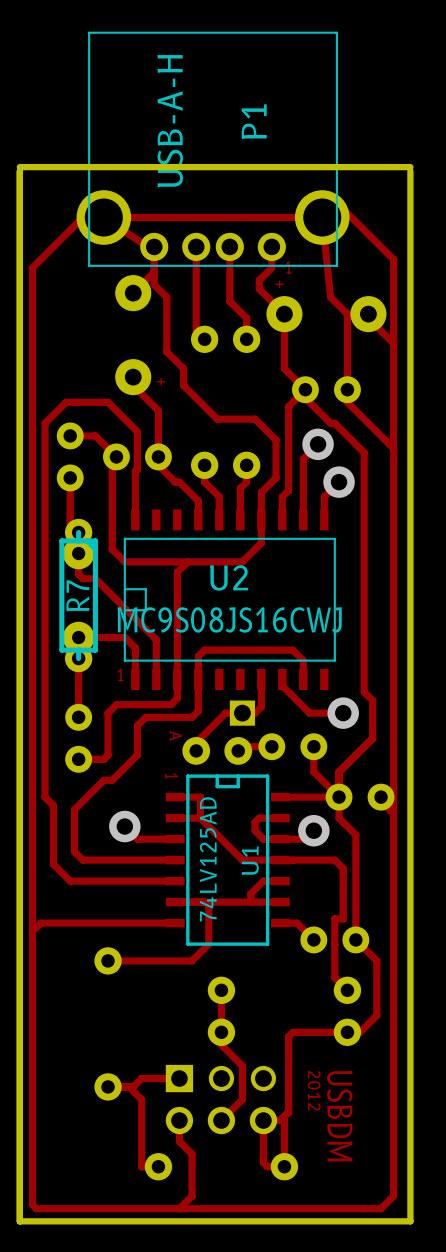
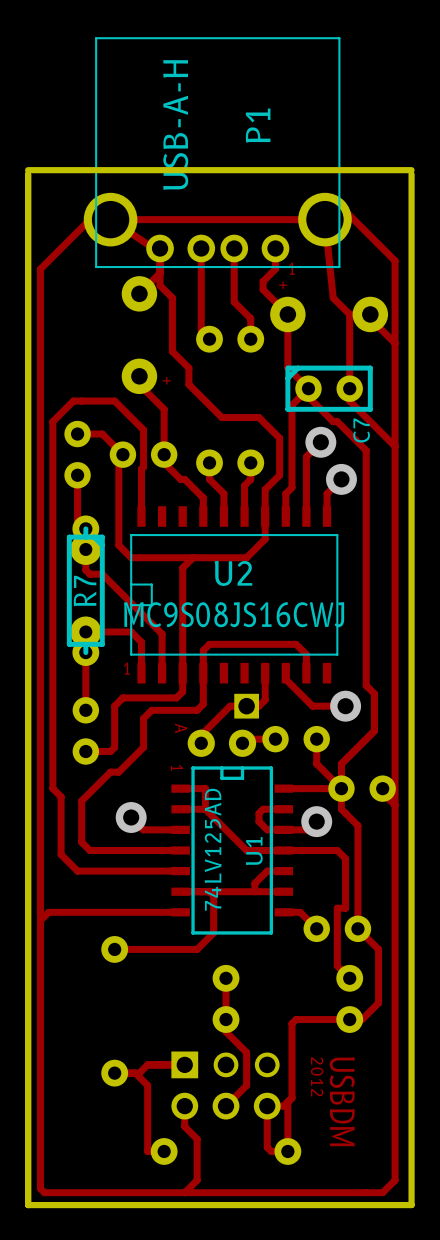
C7 side: bottom (326, 389) -> top (329, 388)

